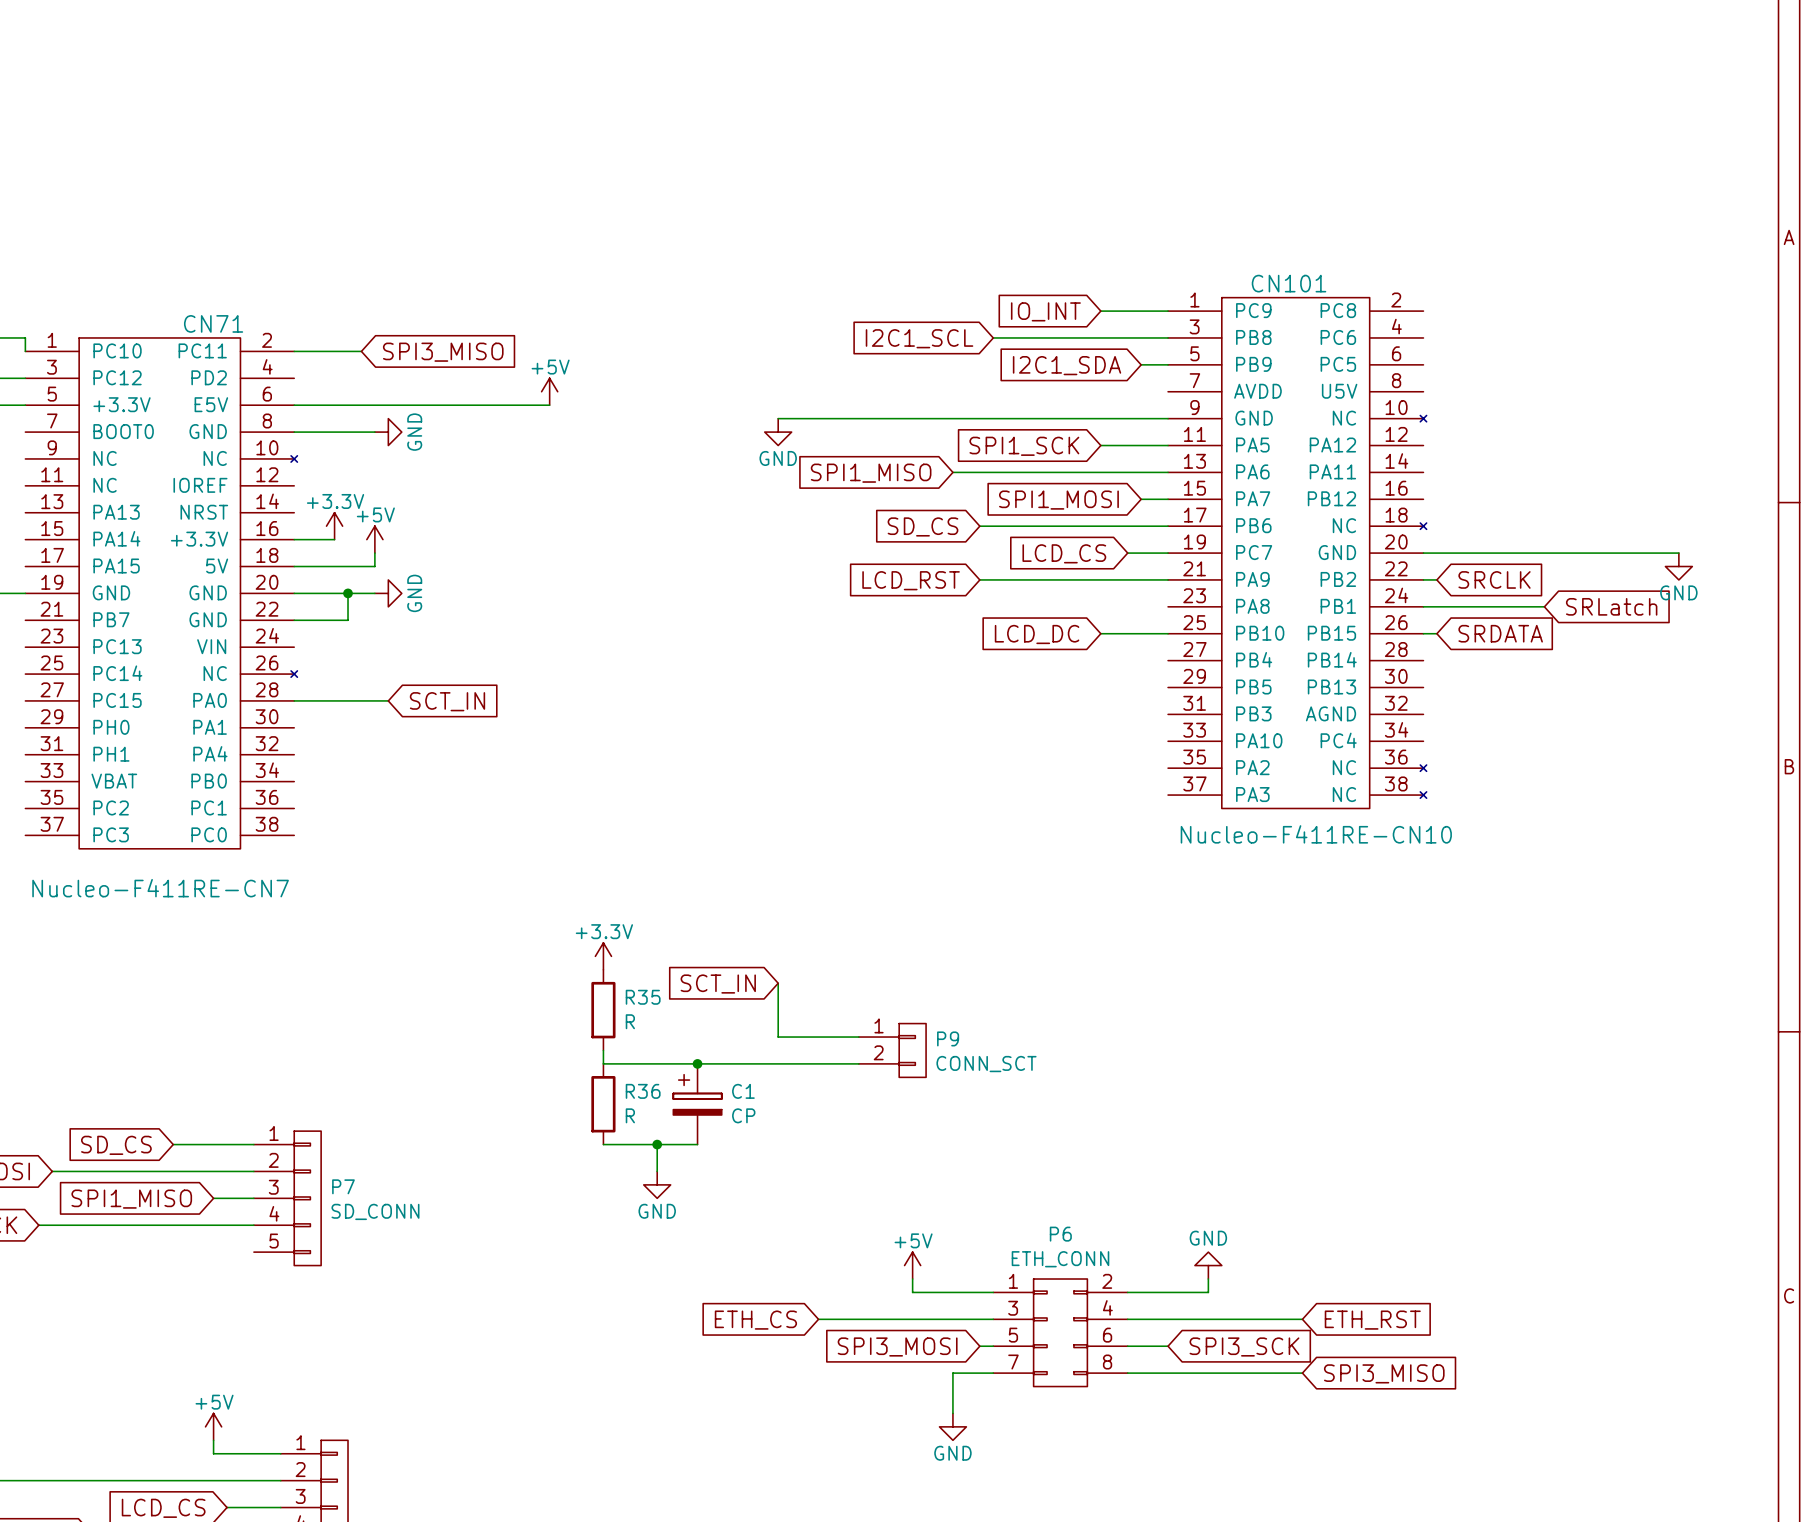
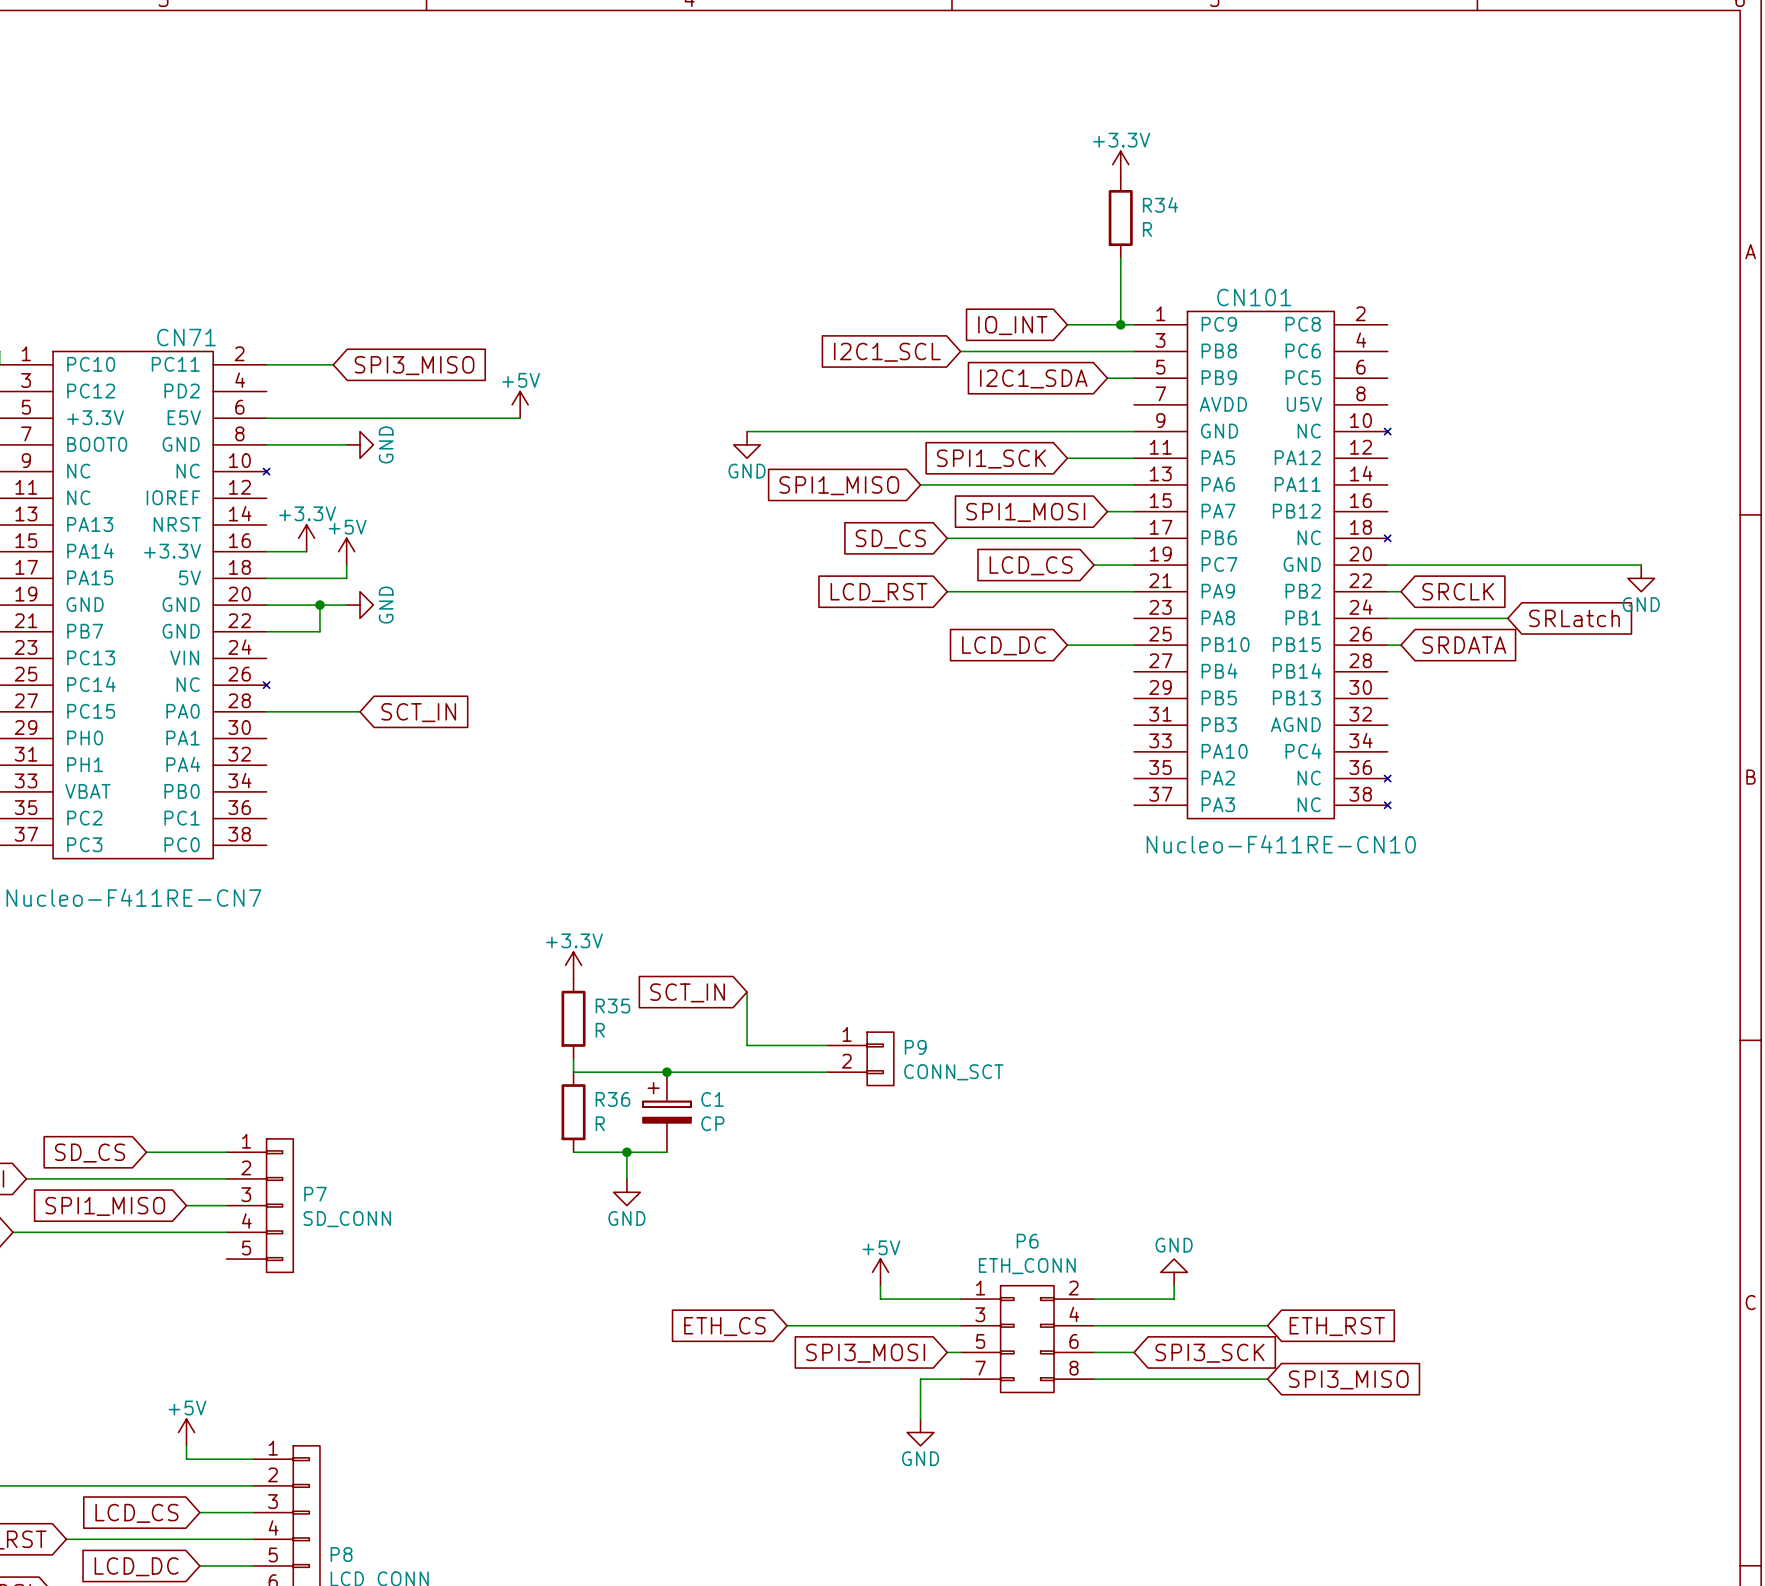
power symbol: none -> +3.3V (1120, 164)
R34: none -> R (1120, 218)
wire: none -> (1120, 258) (1120, 324)
junction: none -> (1120, 324)

